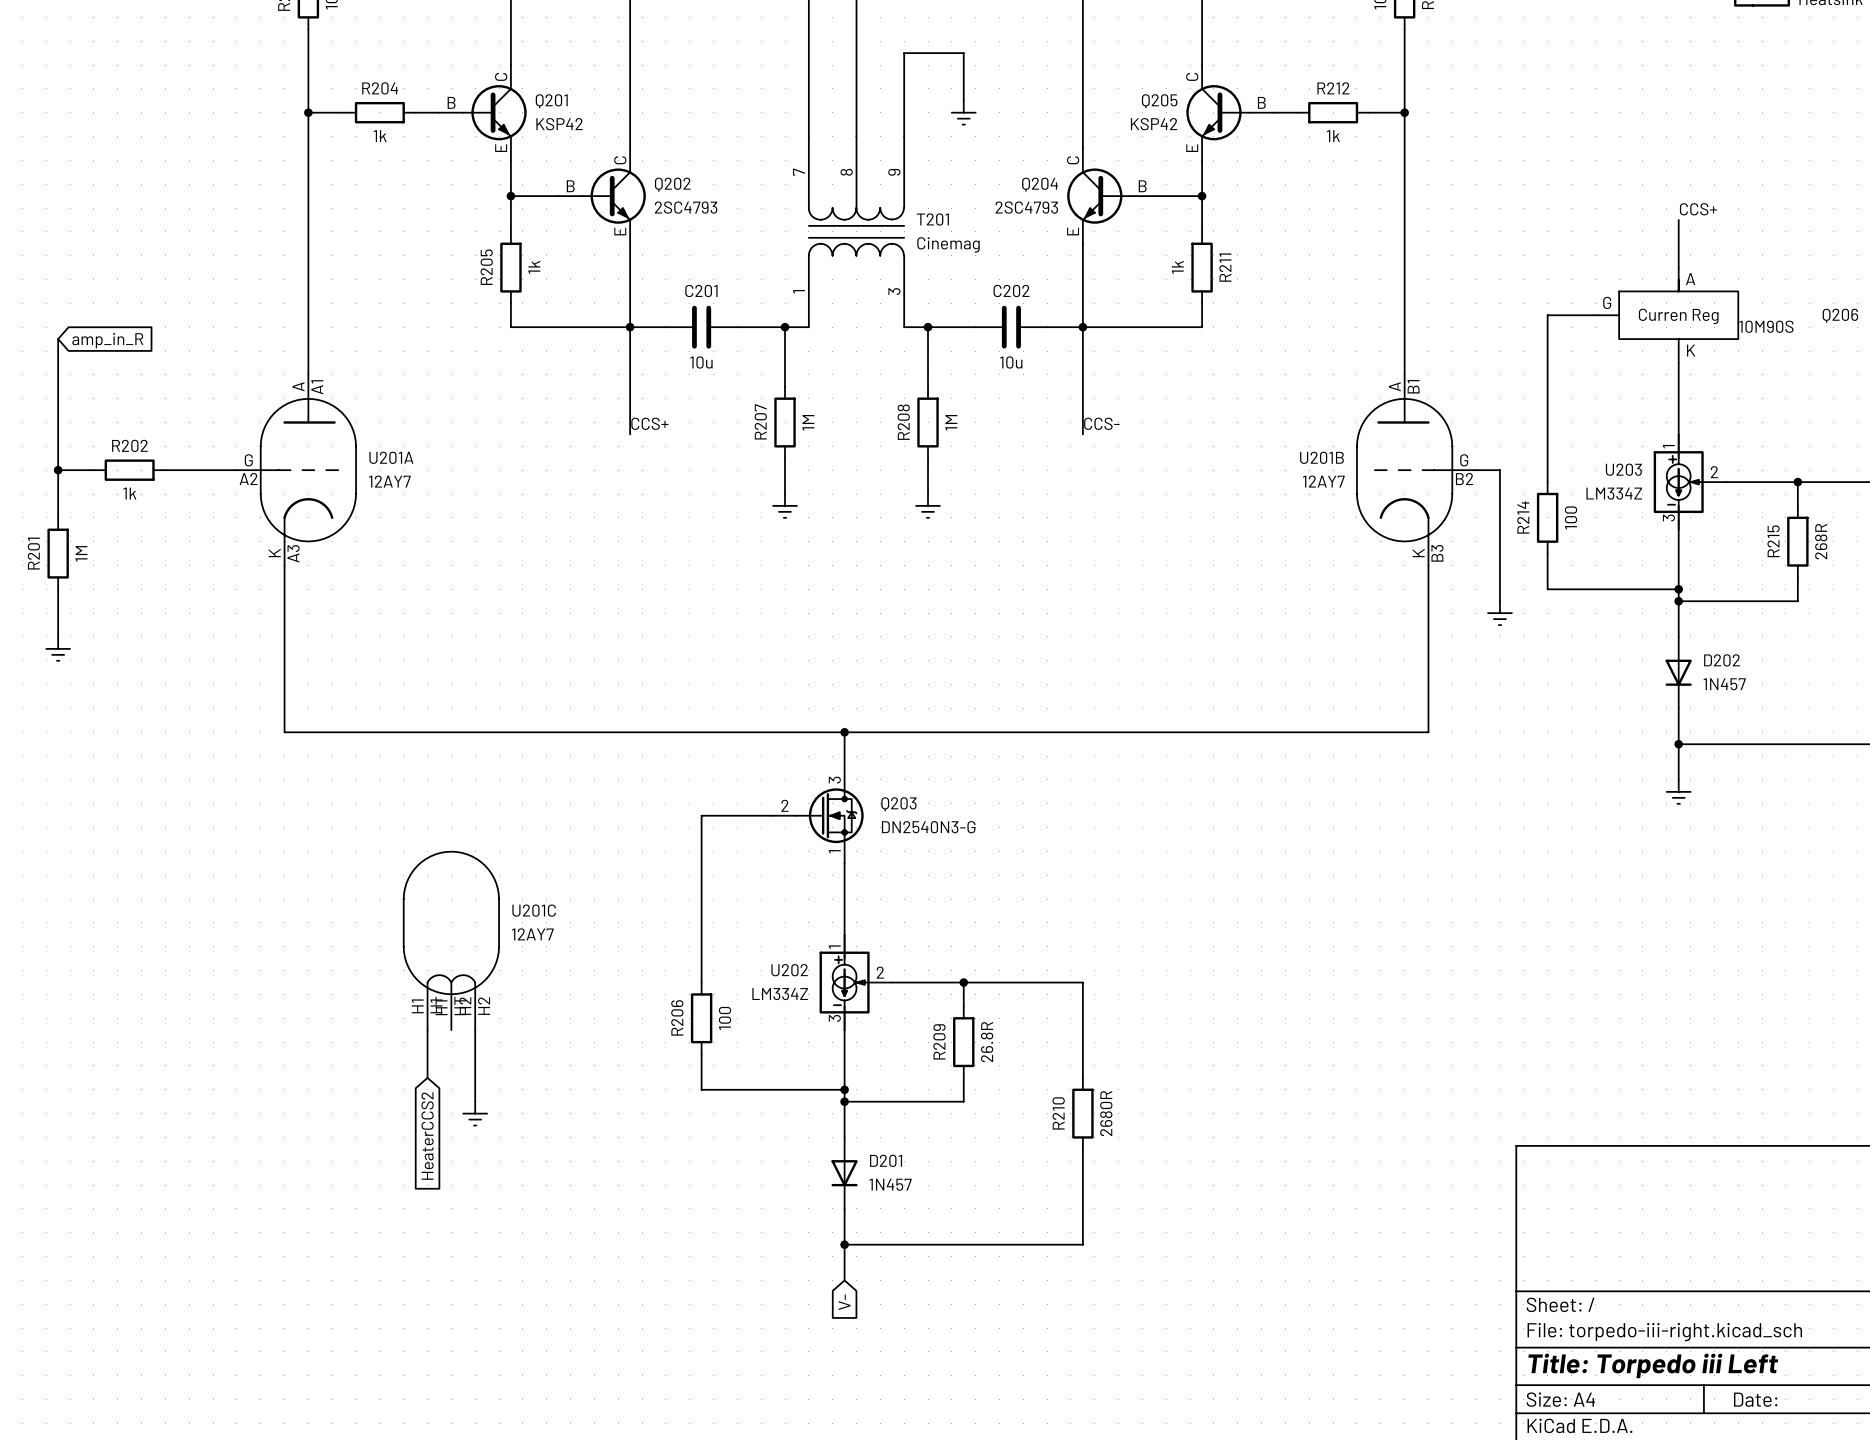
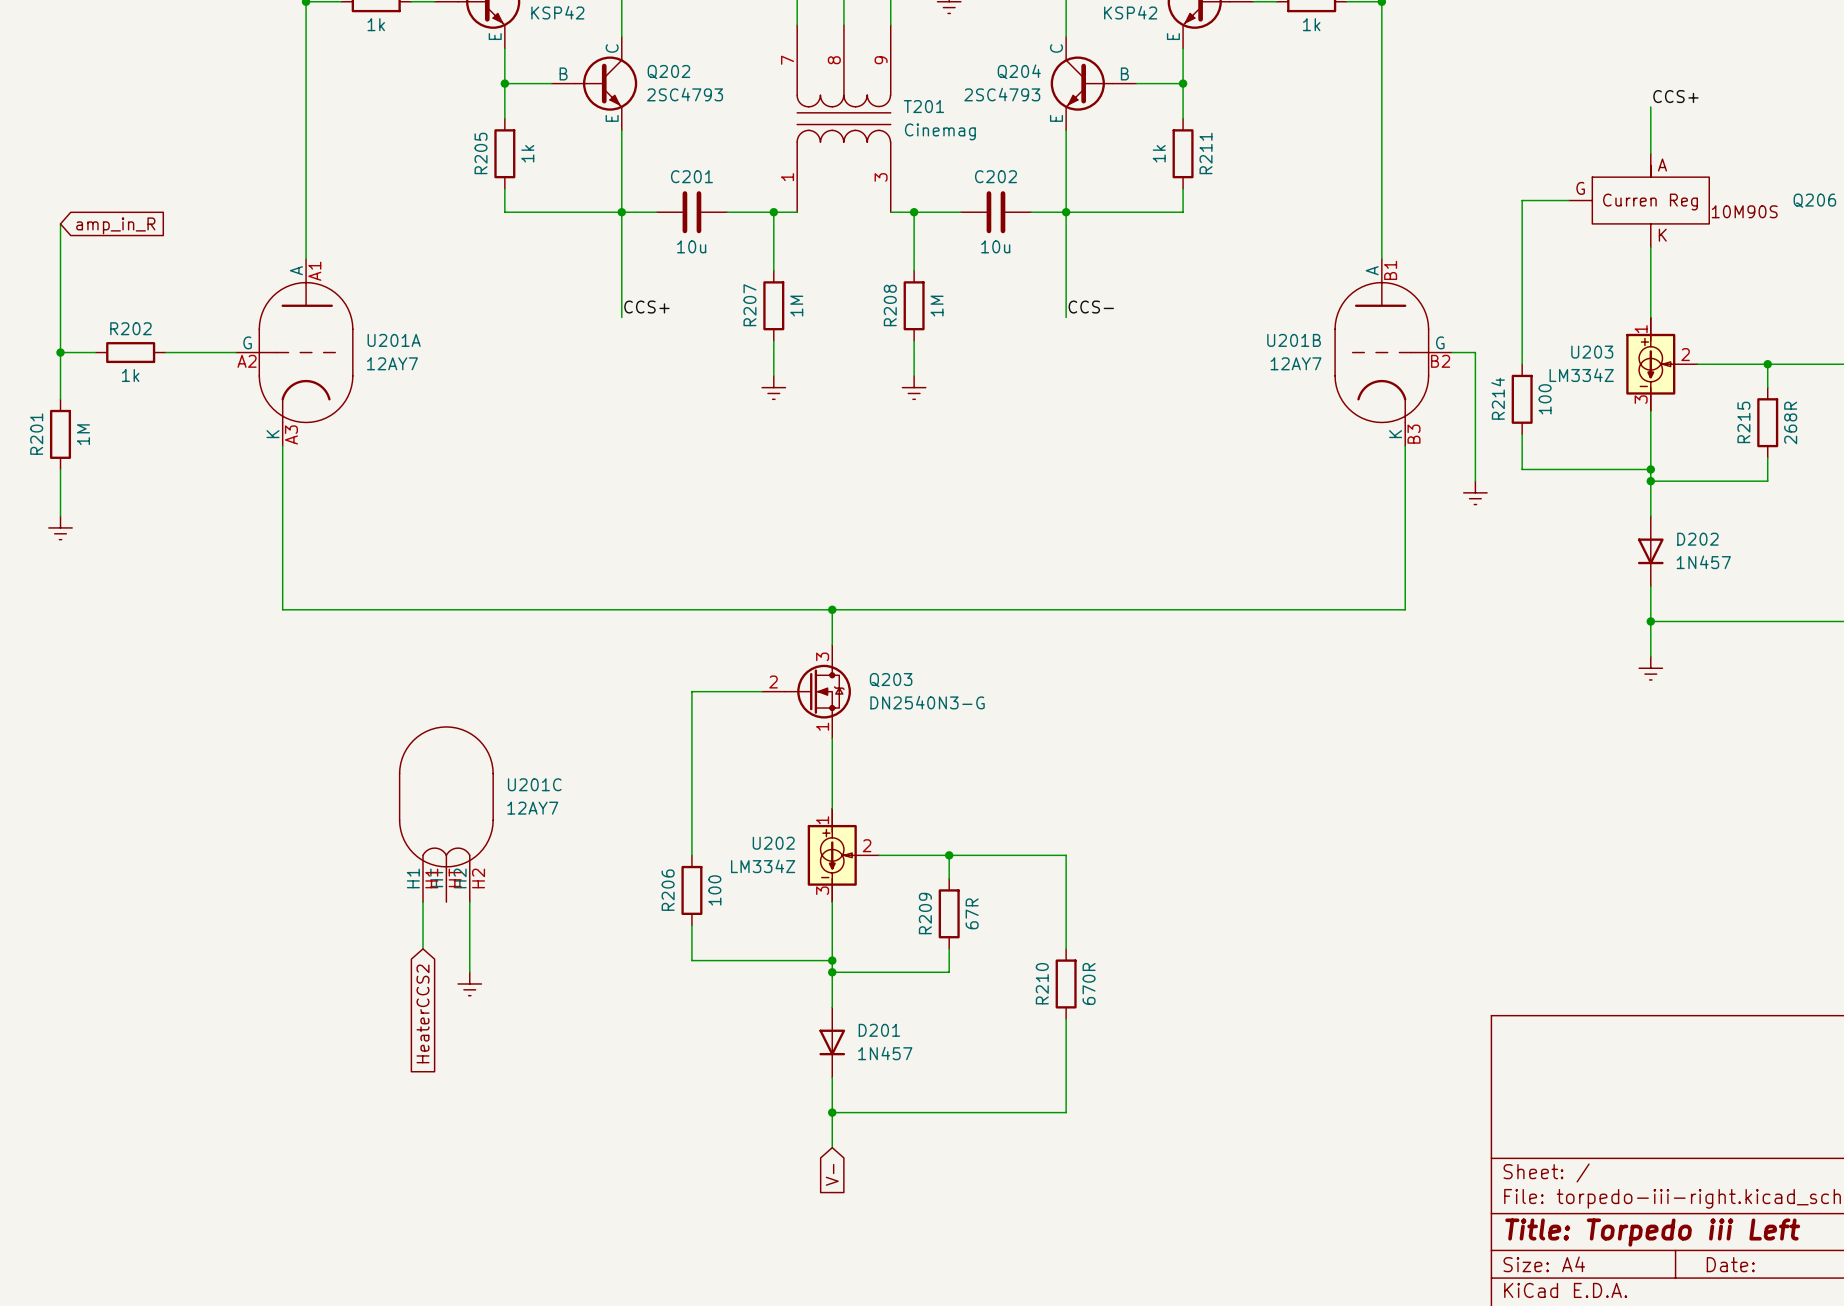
R209 value: 26.8R (987, 1042) -> 67R (972, 913)
R210 value: 2680R (1106, 1113) -> 670R (1089, 983)

